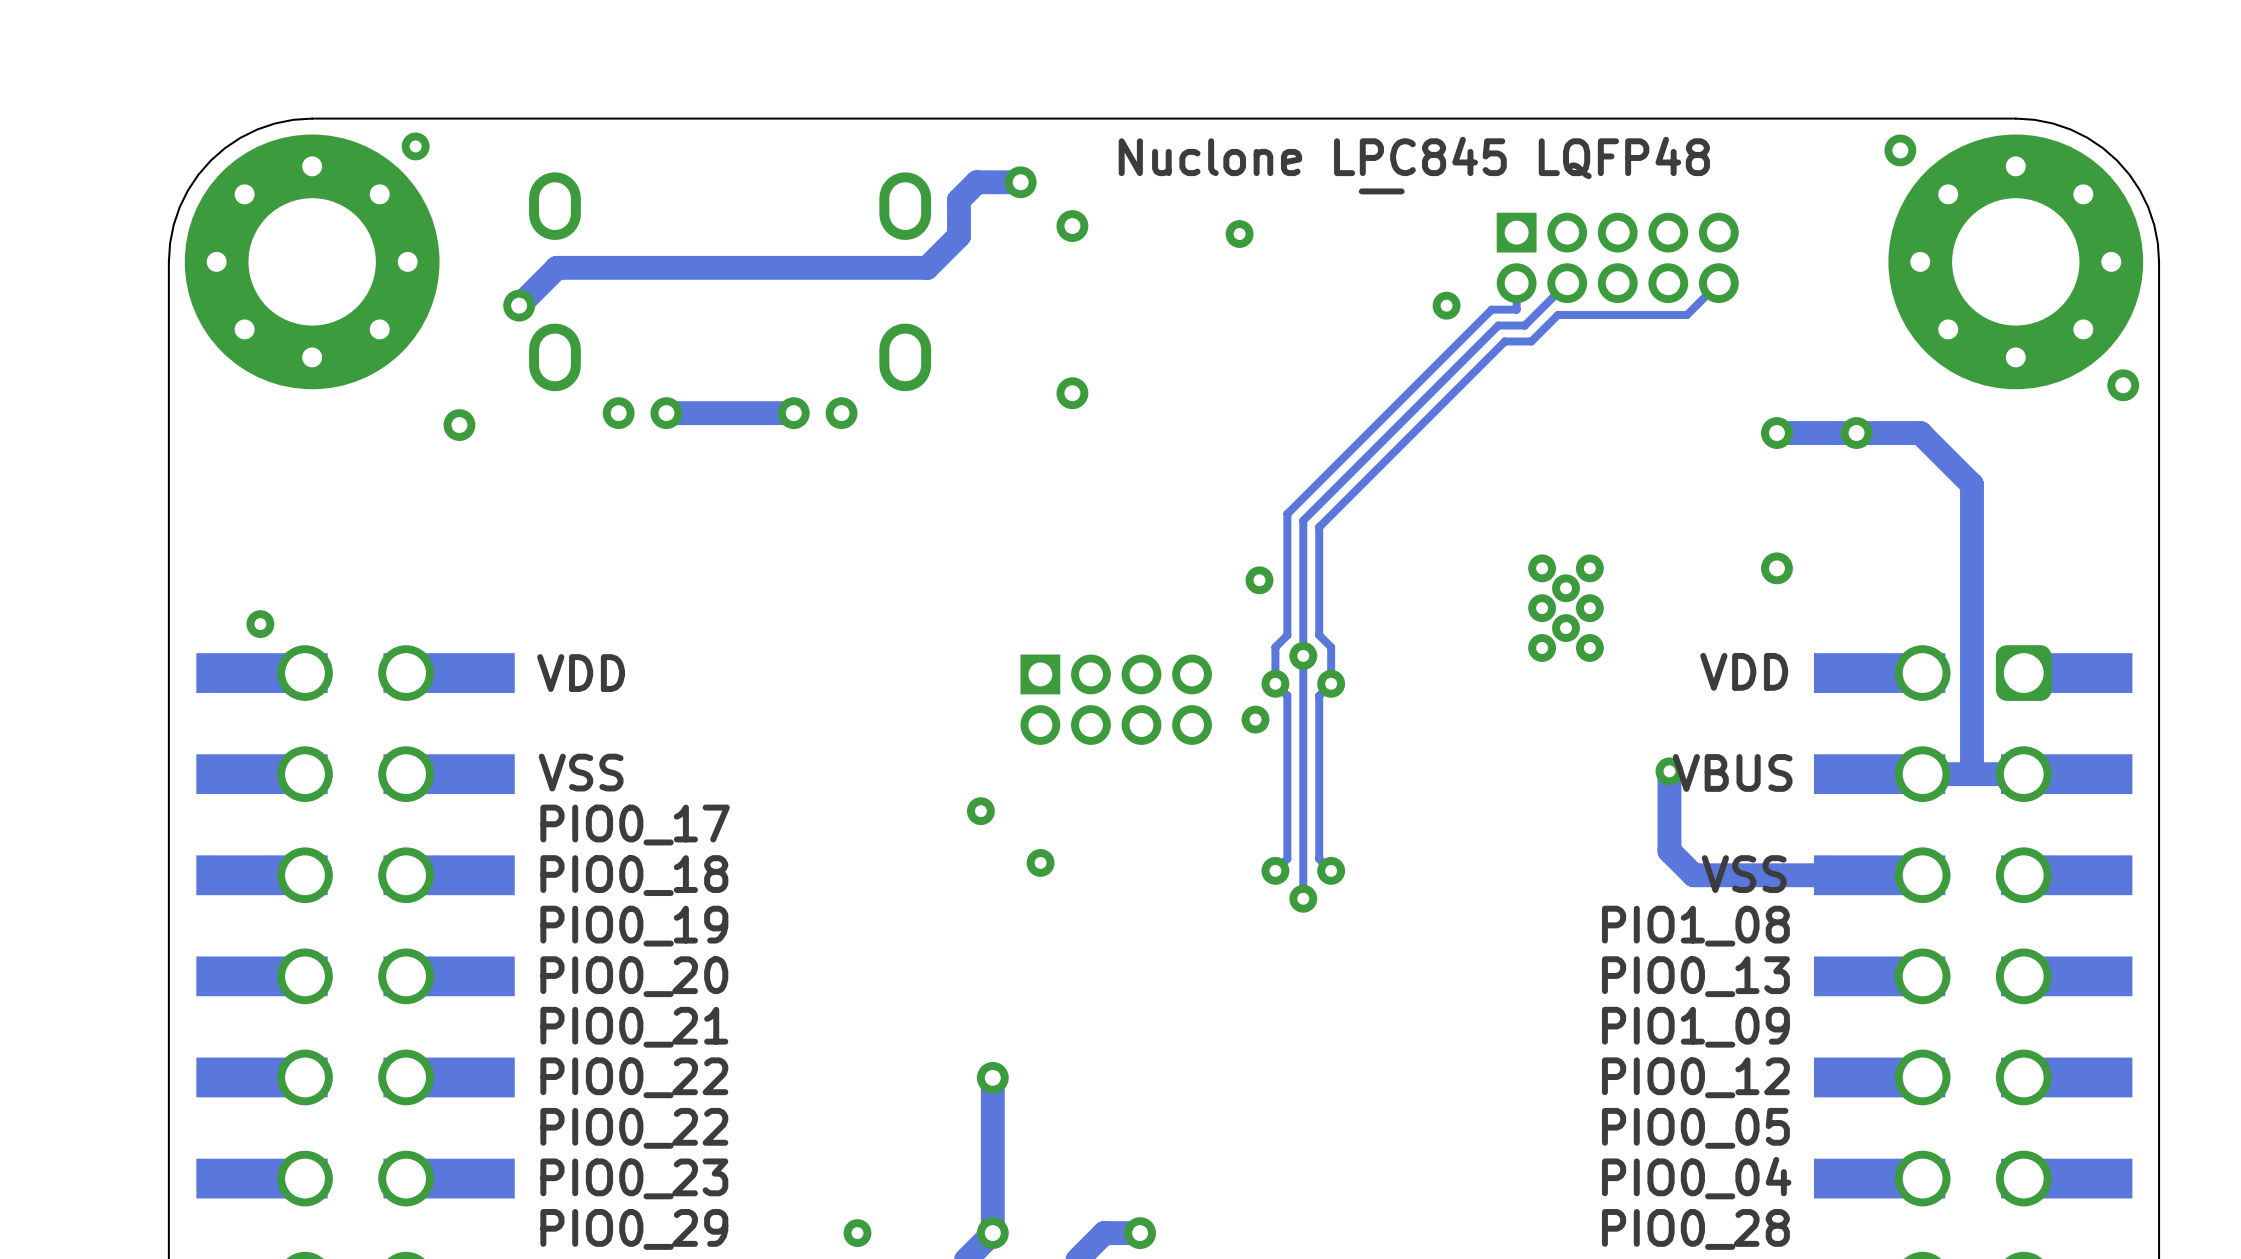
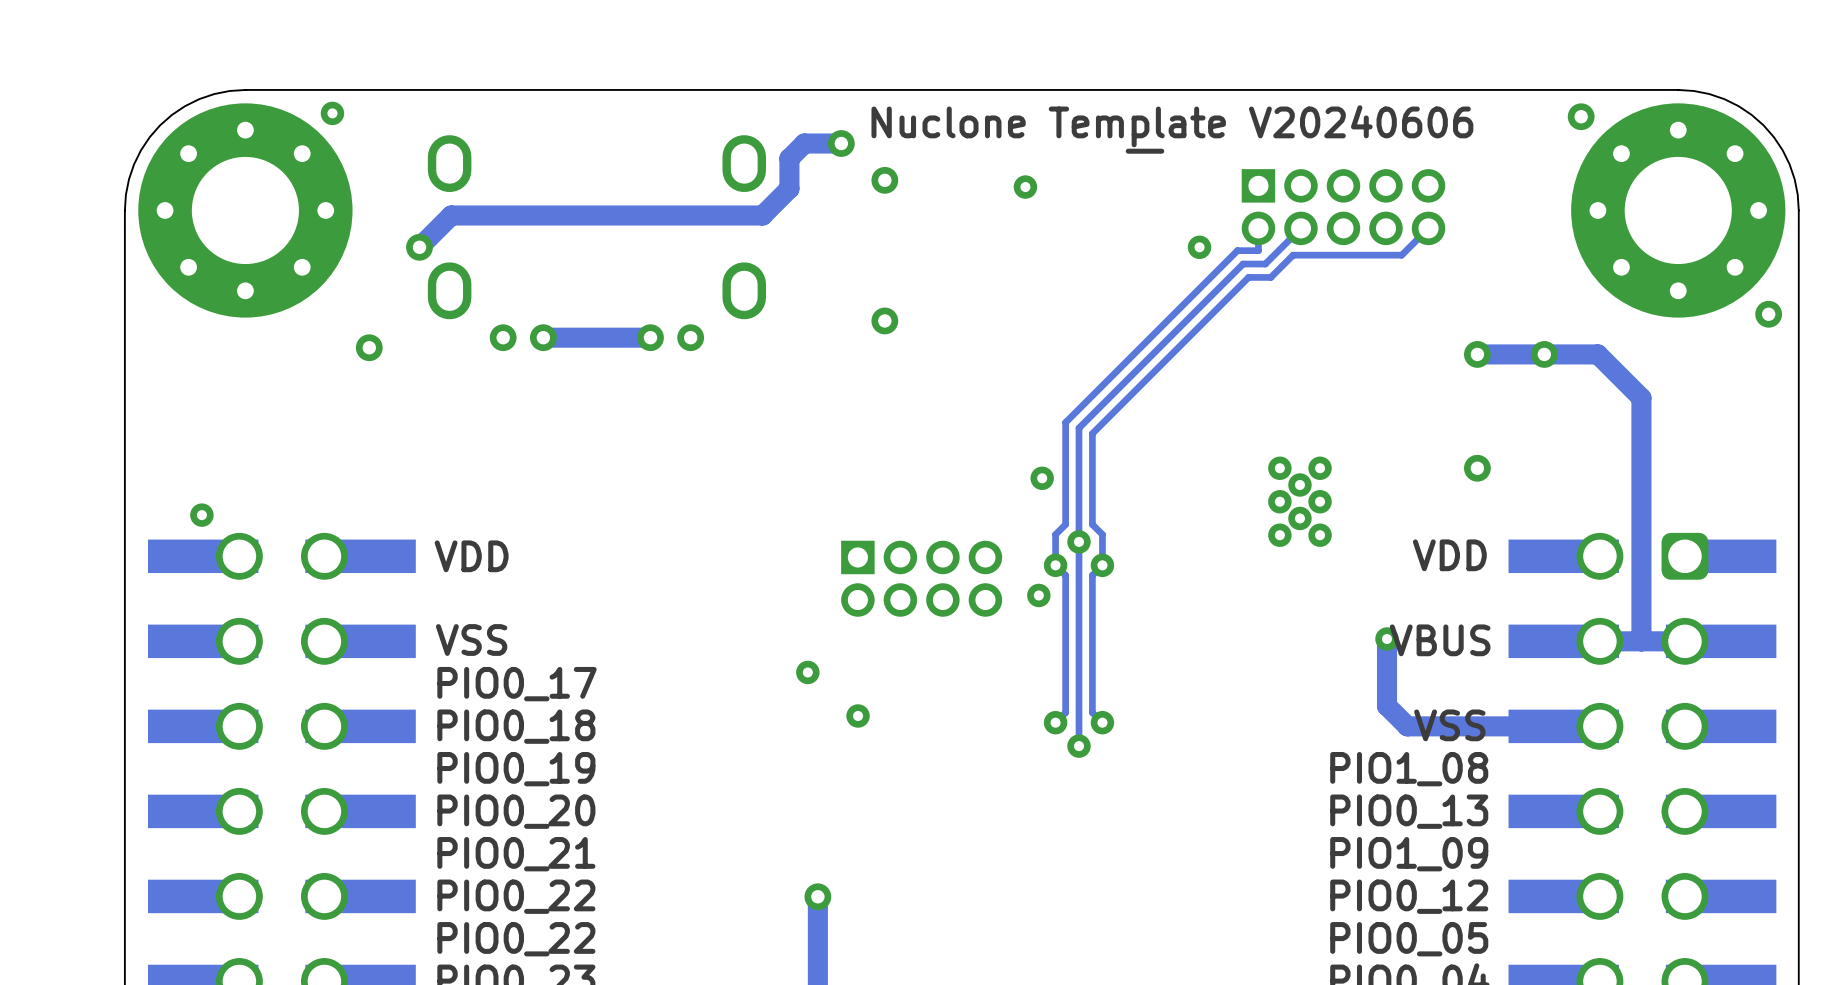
drawing shape: [1118, 136, 1710, 195] -> [871, 105, 1474, 154]

